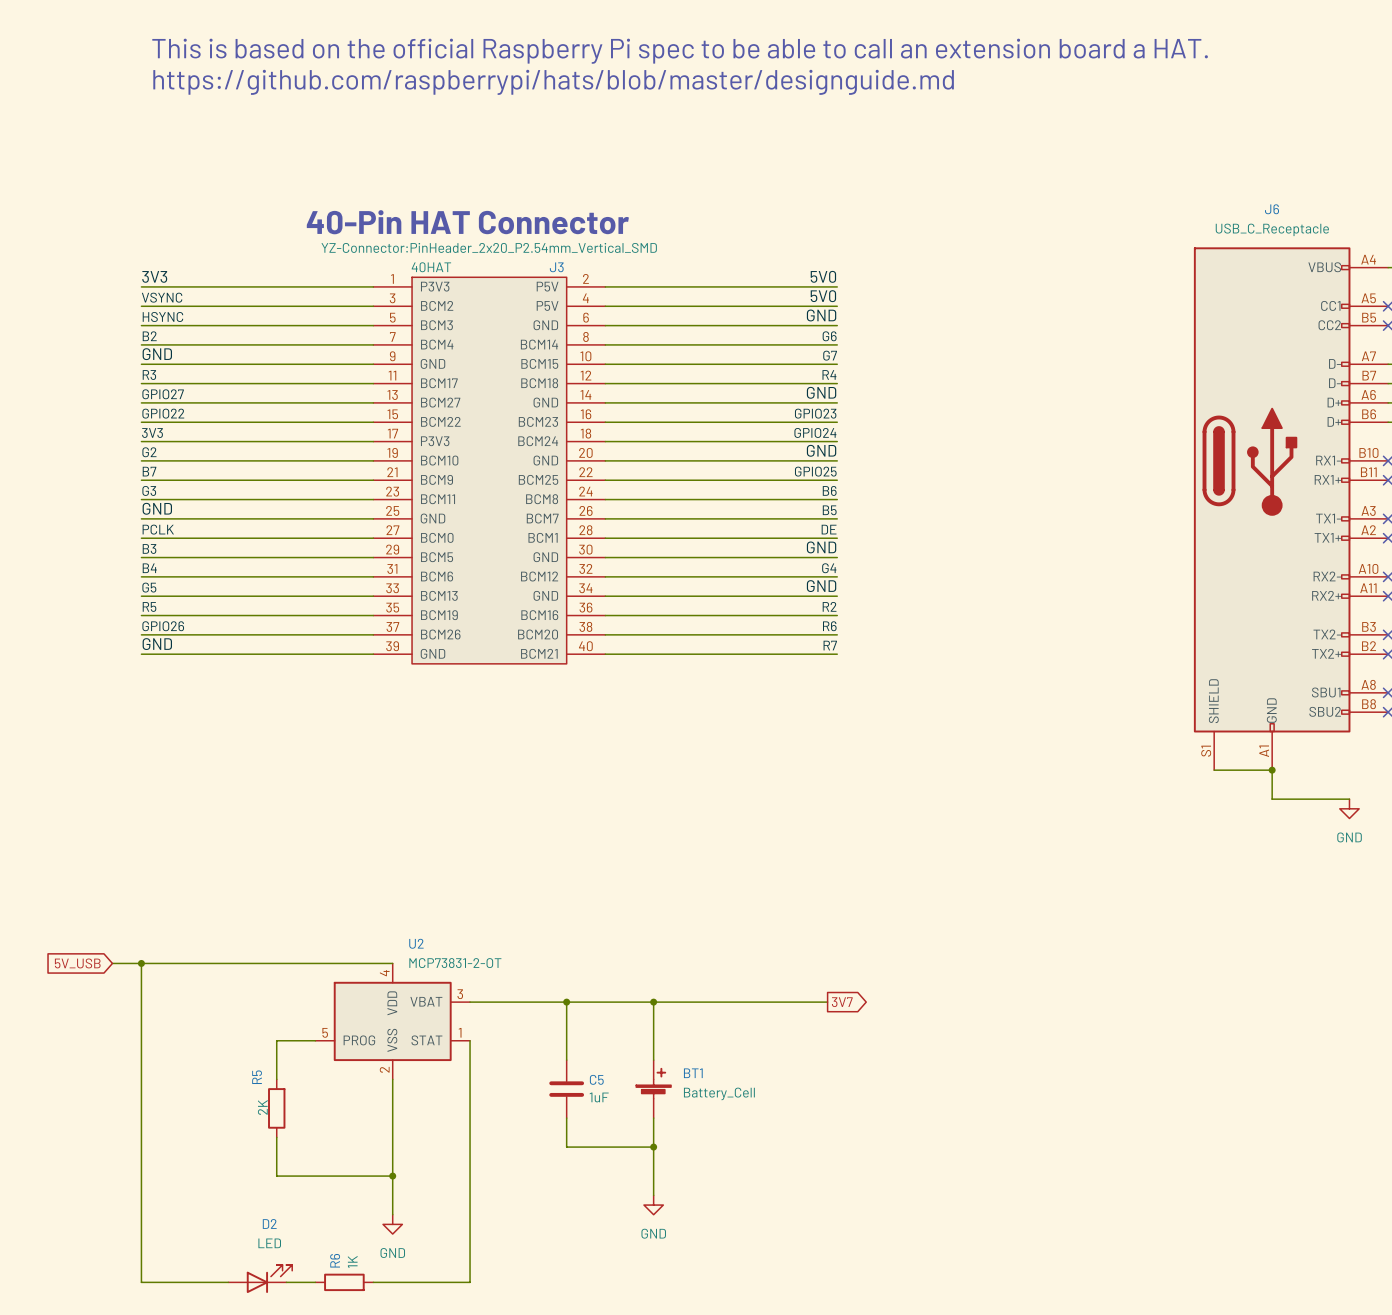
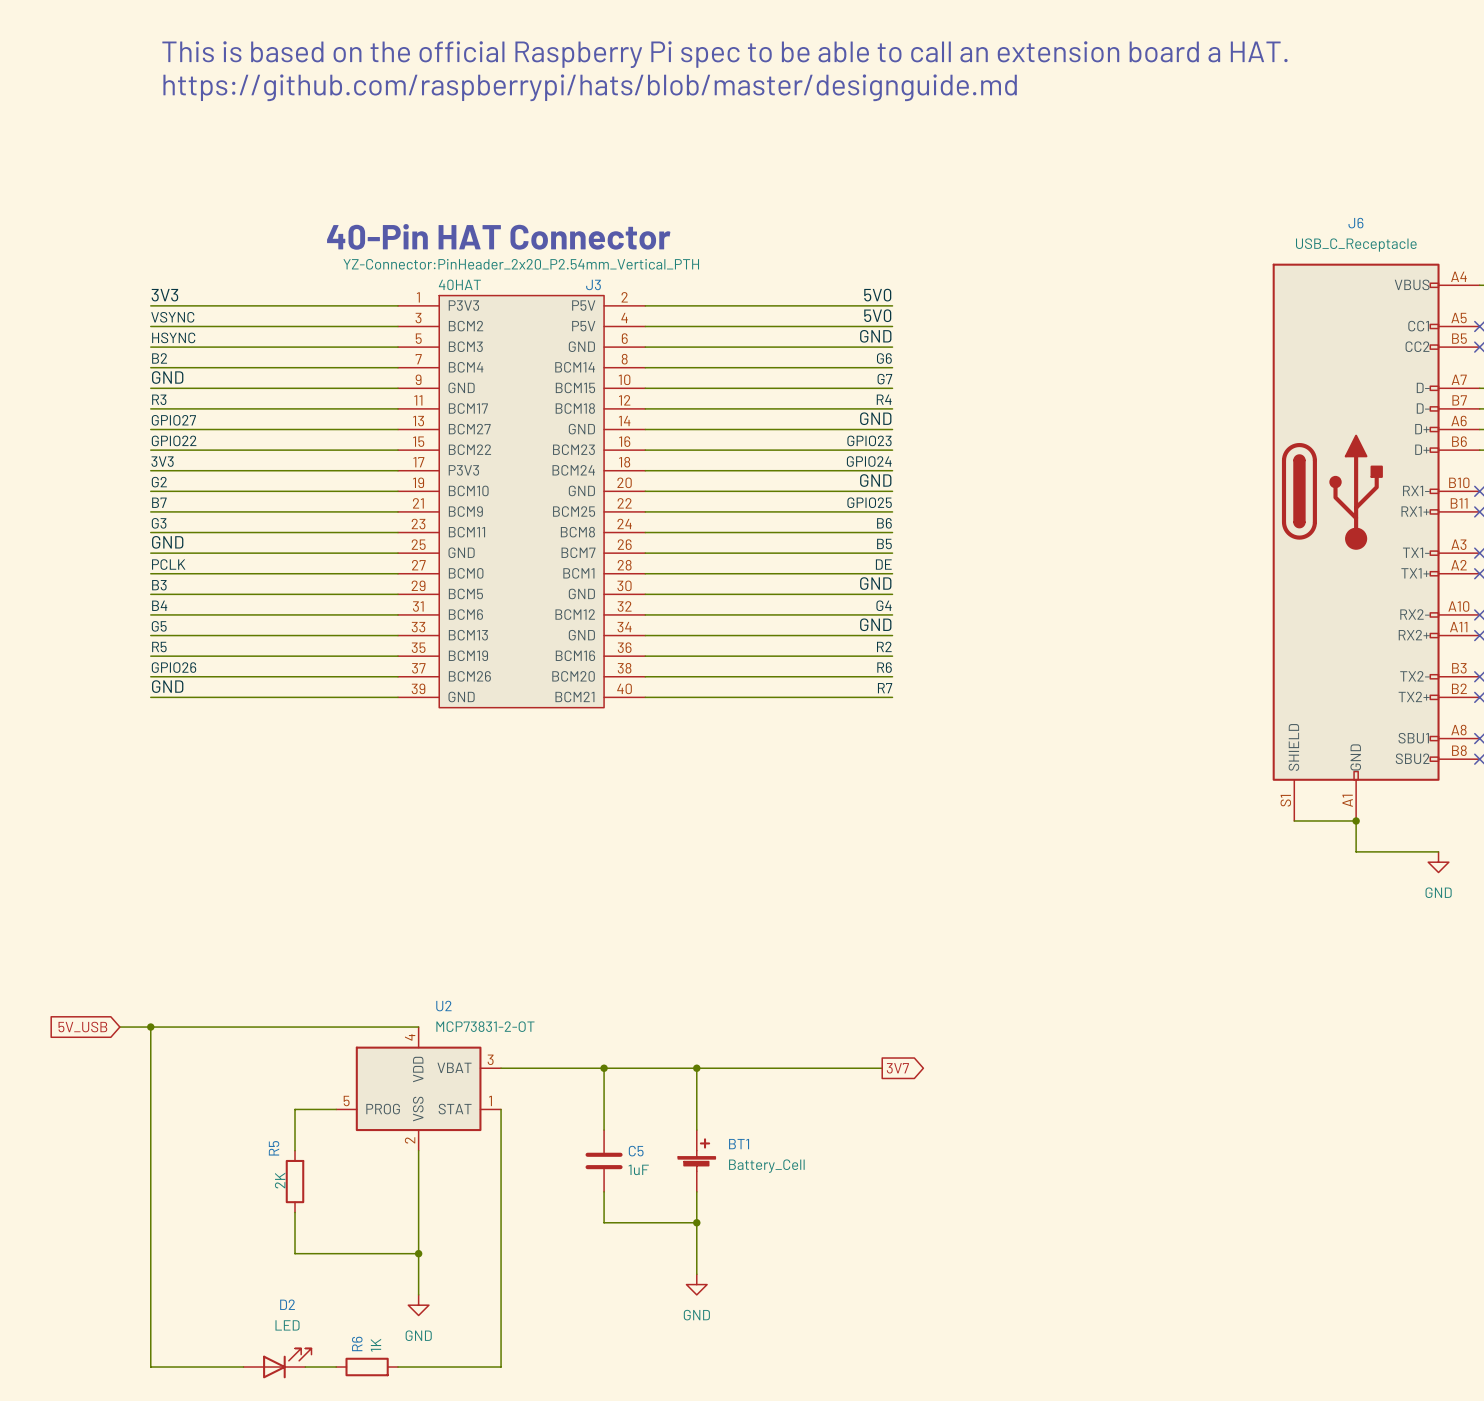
J3 text: YZ-Connector:PinHeader_2x20_P2.54mm_Vertical_SMD (489, 247) -> YZ-Connector:PinHeader_2x20_P2.54mm_Vertical_PTH (521, 264)

